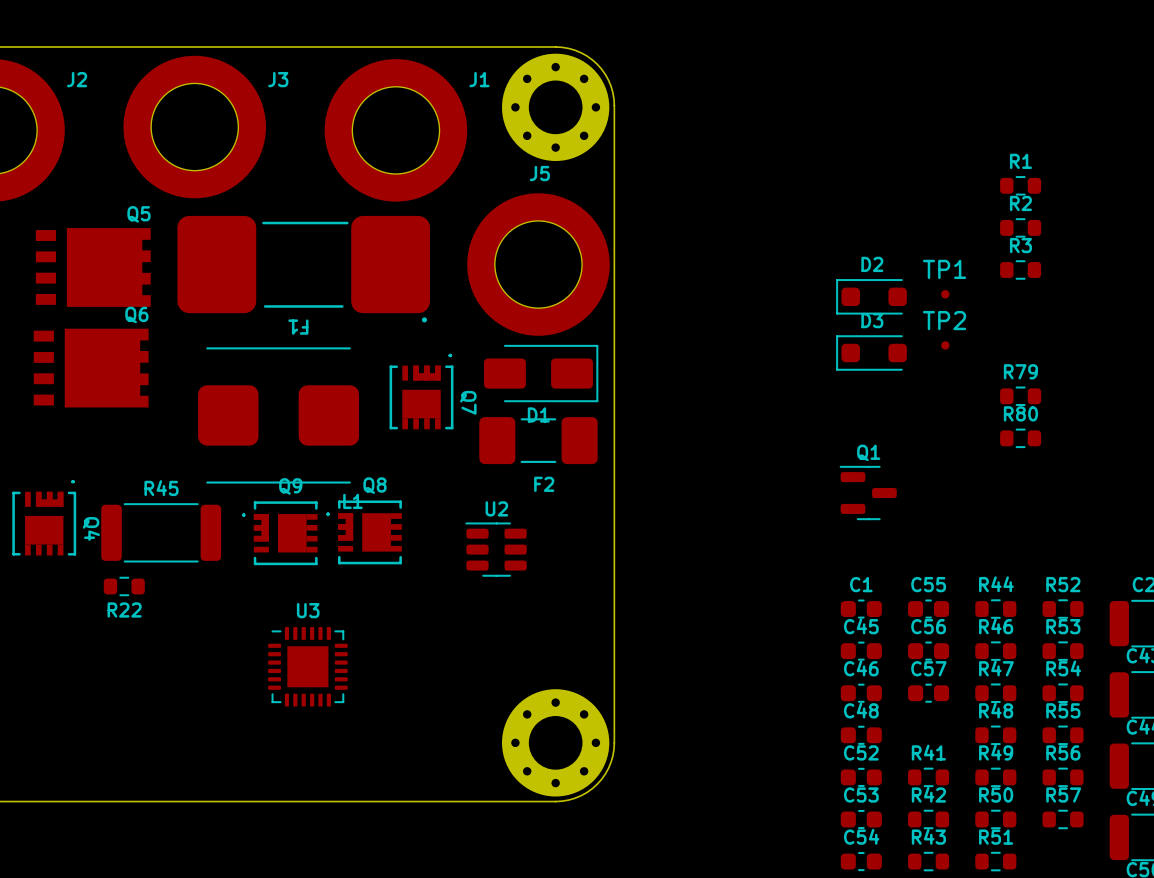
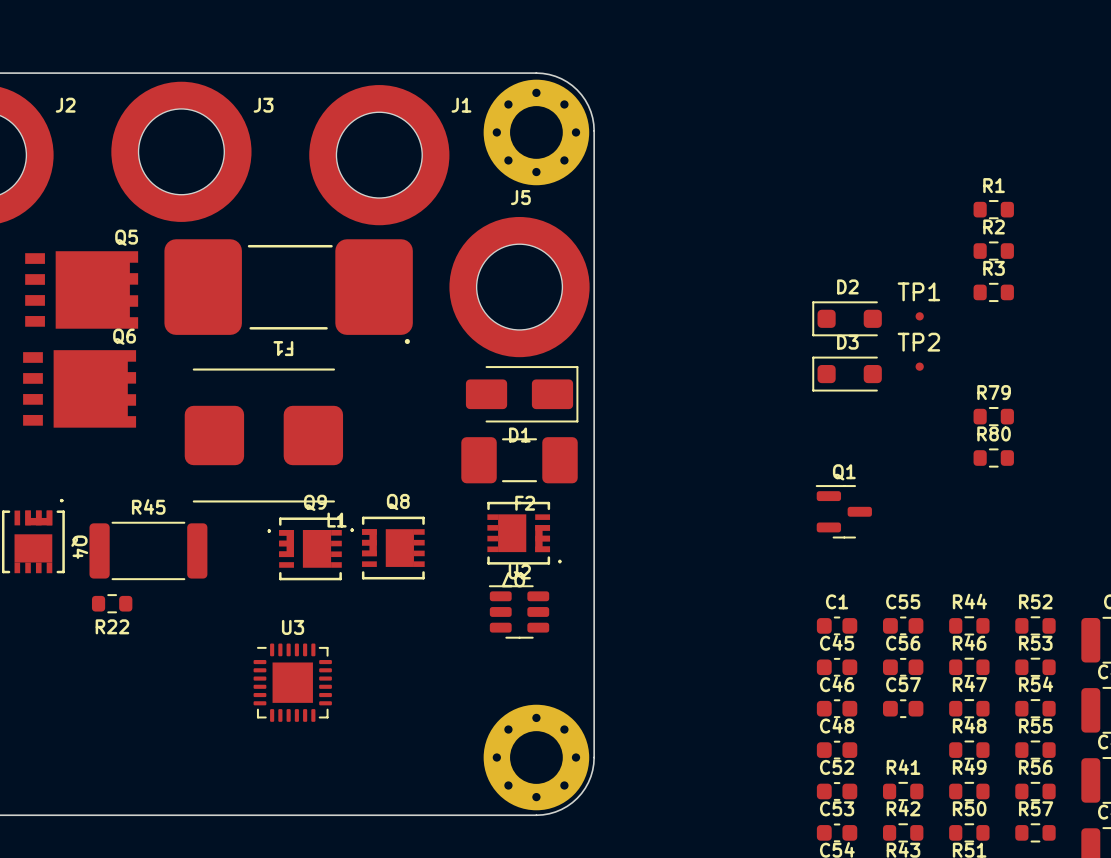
Q7 rotation: 0° (421, 397) -> 90° clockwise (518, 533)
Q7 position: (421, 397) -> (518, 533)
Q8 position: (369, 532) -> (393, 548)
Q9 position: (285, 533) -> (310, 548)
U2 position: (496, 549) -> (519, 611)

